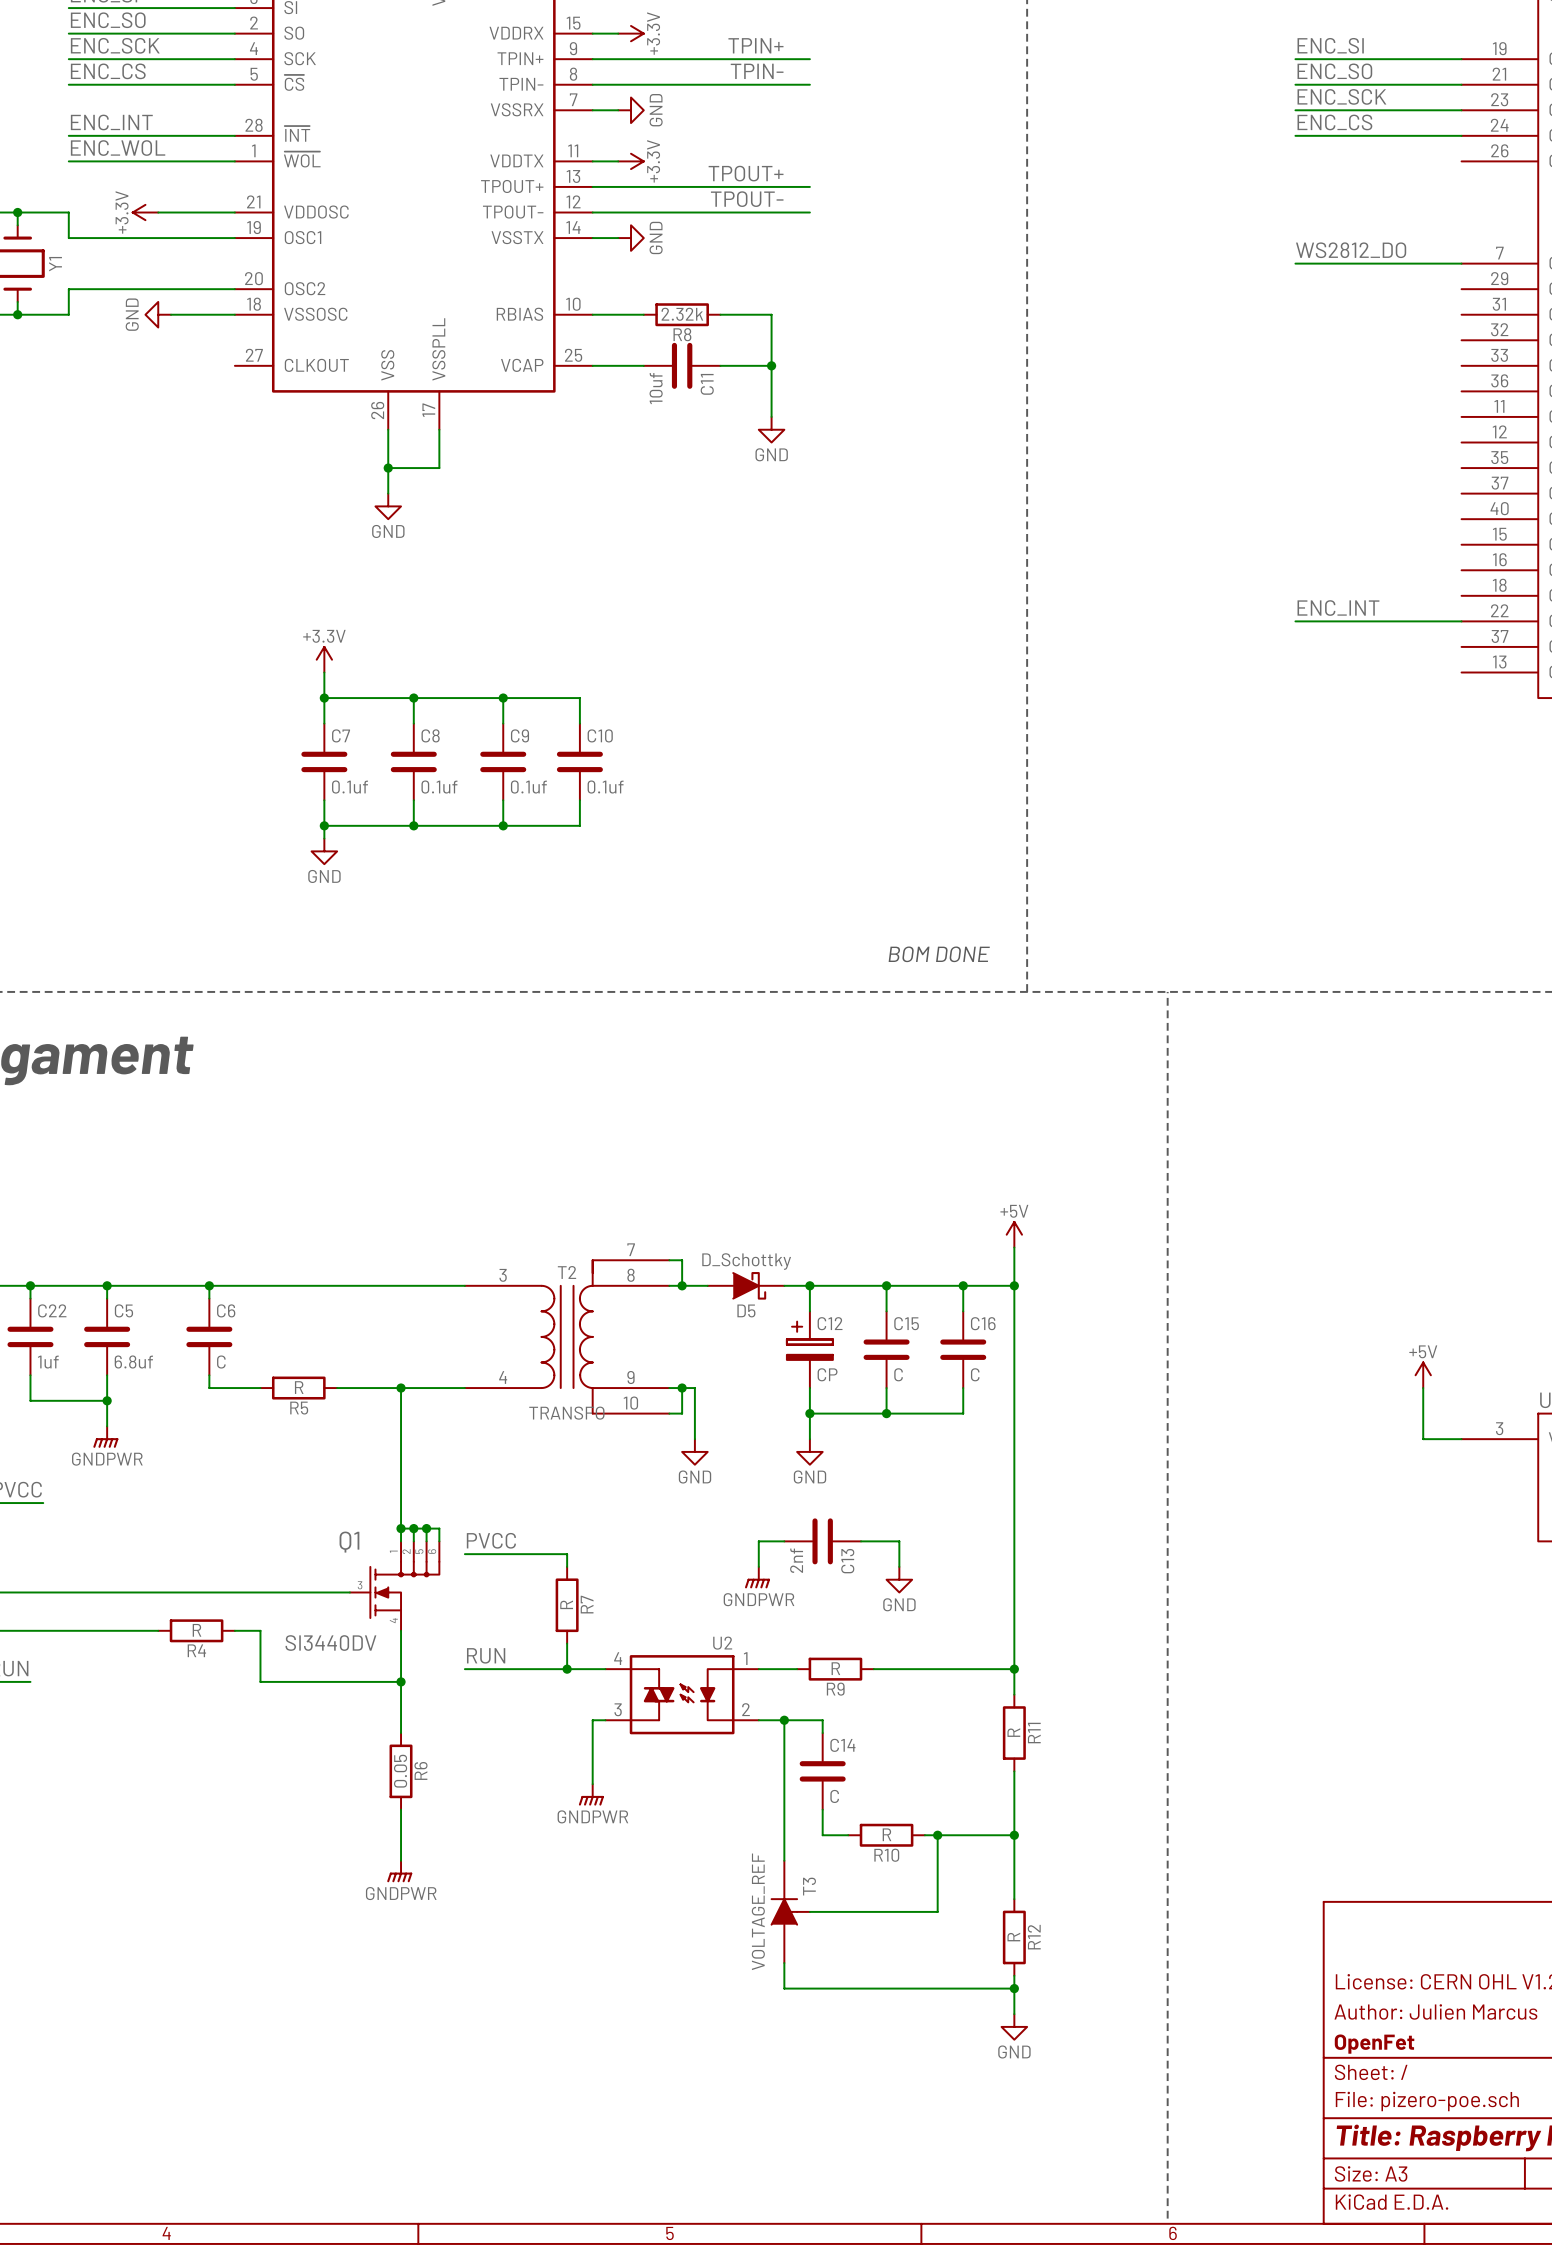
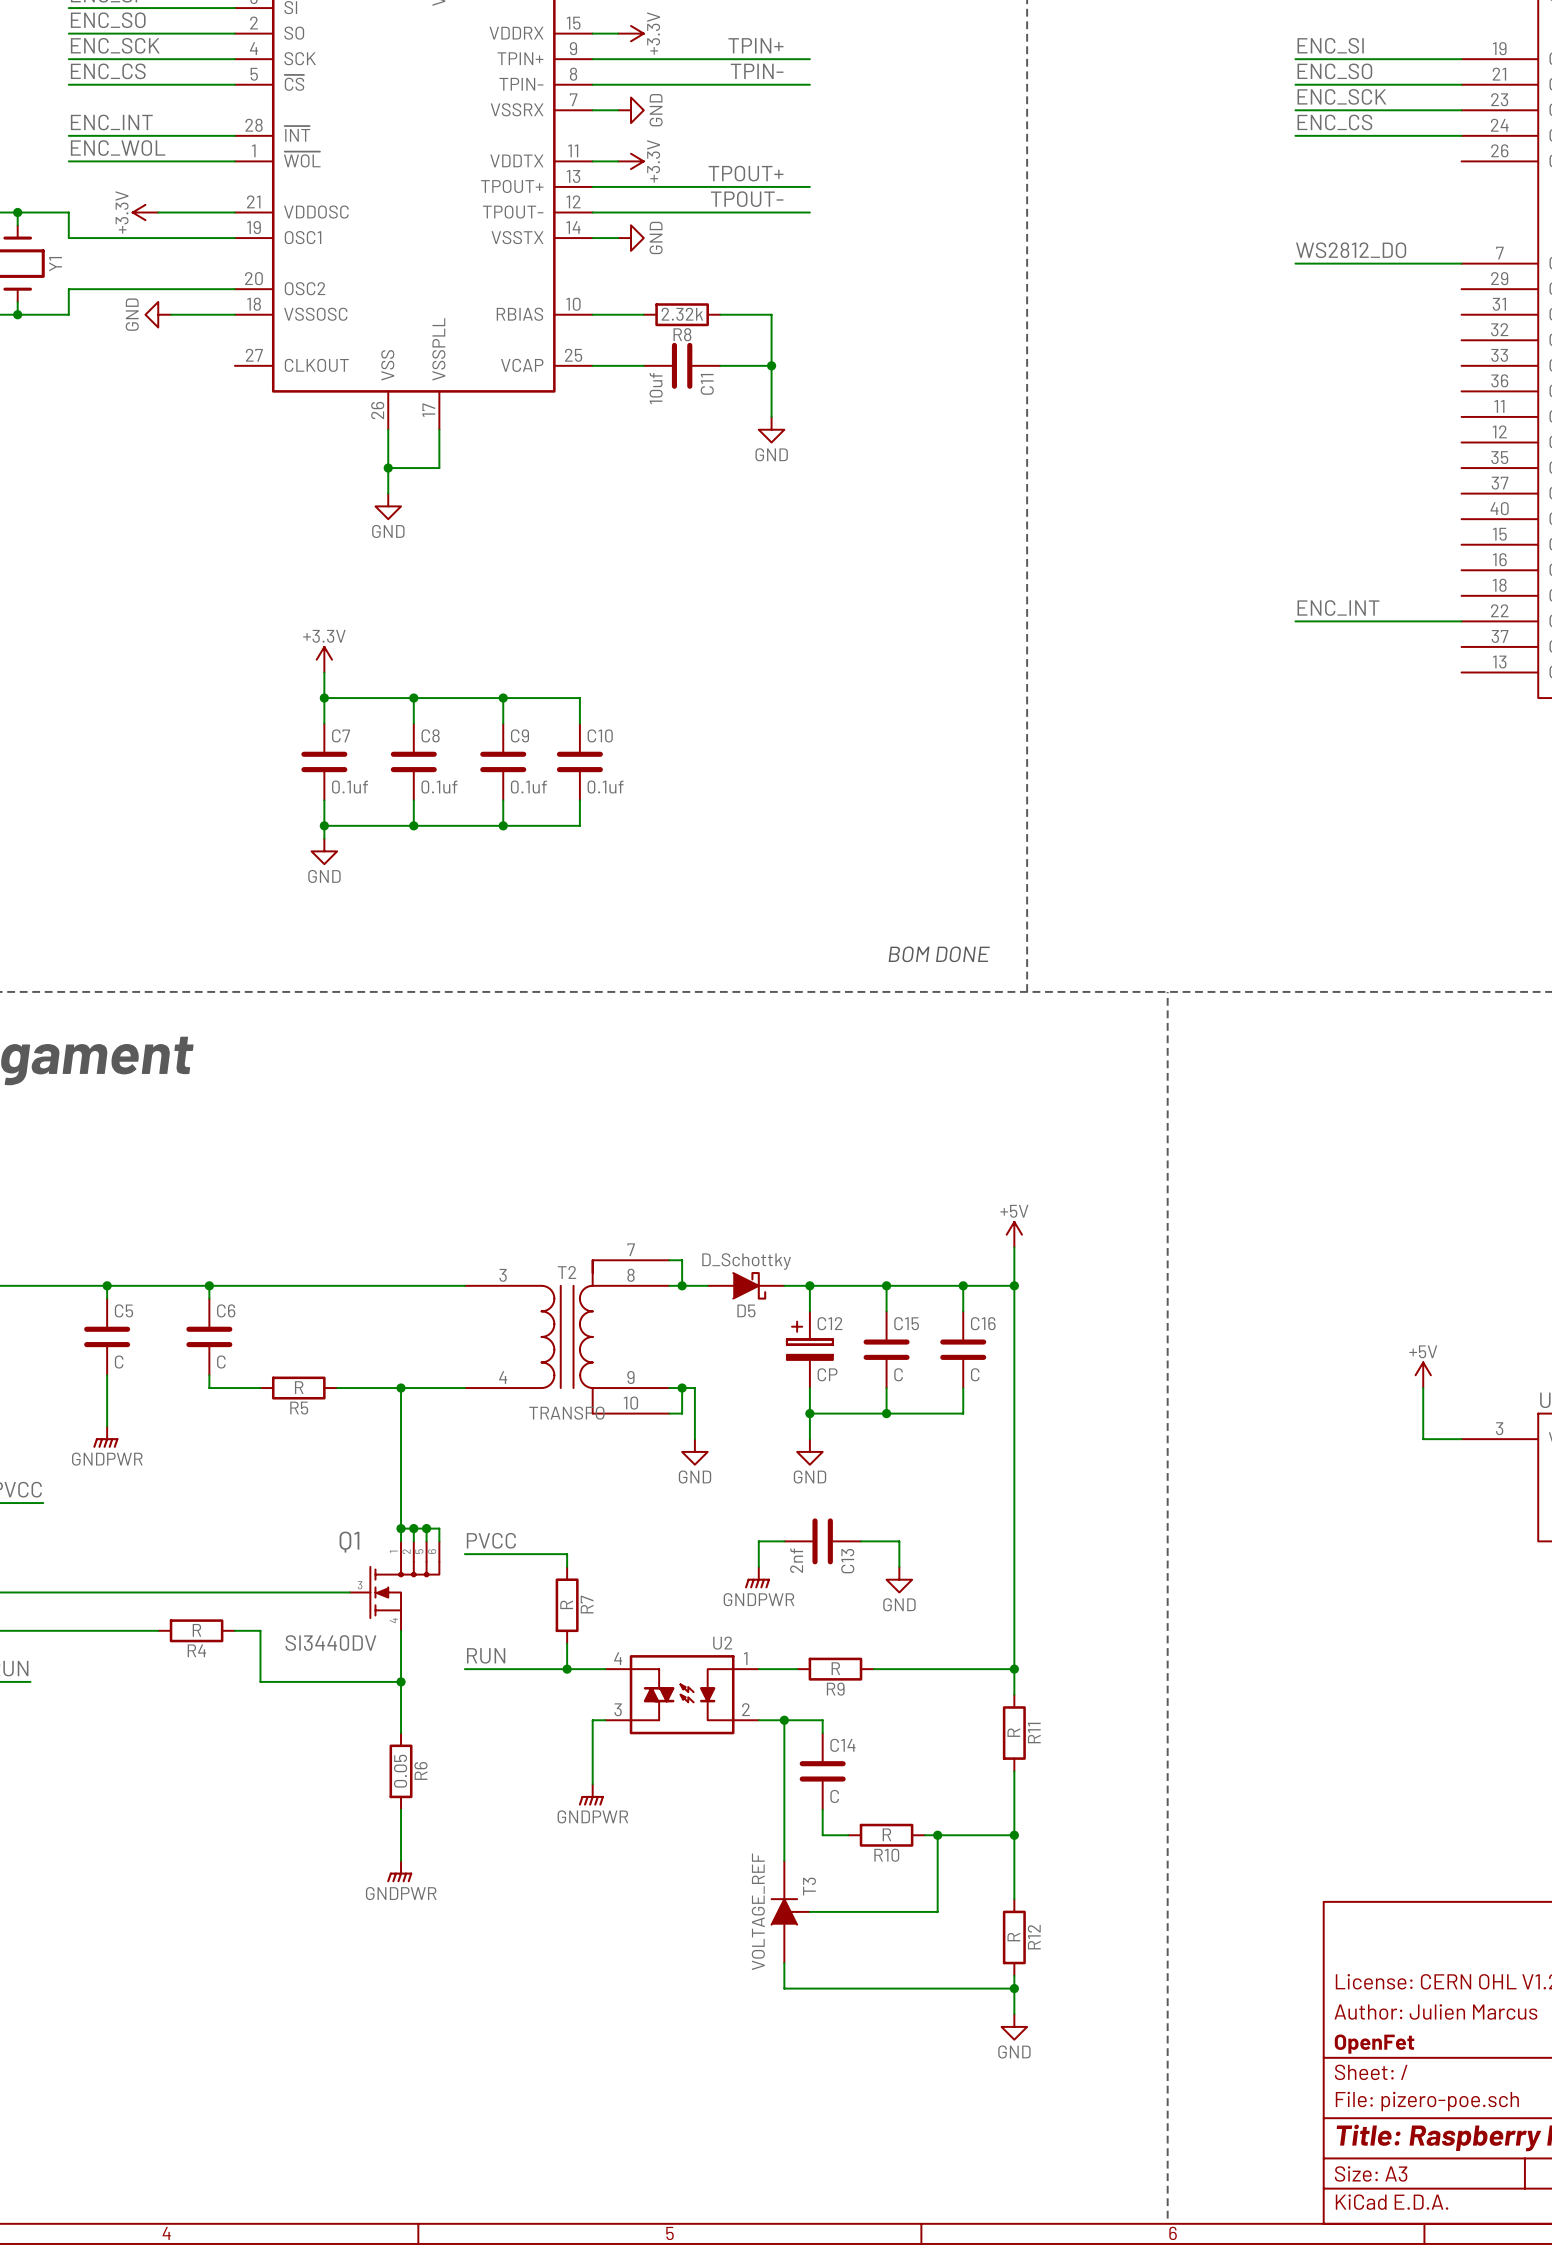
wire: (30, 1285) (30, 1298) -> none
junction: (30, 1285) -> none
C22: 1uf (30, 1336) -> none
C5 value: 6.8uf (133, 1361) -> C (119, 1362)
wire: (30, 1375) (30, 1400) (107, 1400) -> none
junction: (107, 1400) -> none

